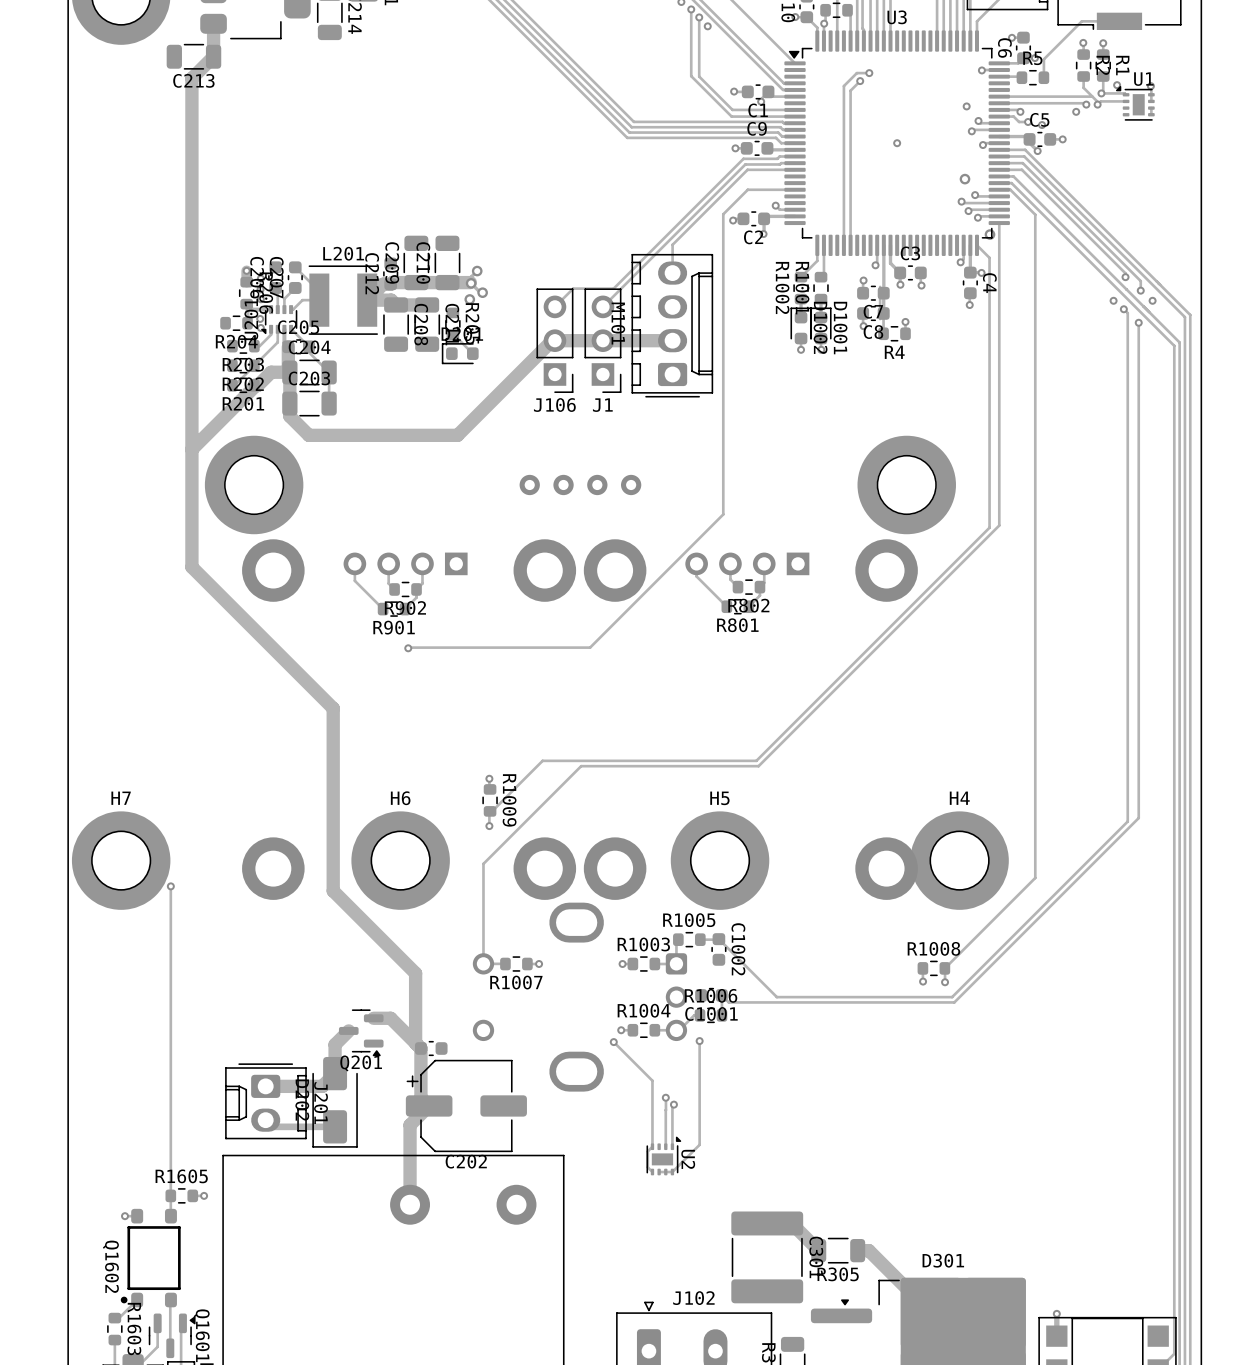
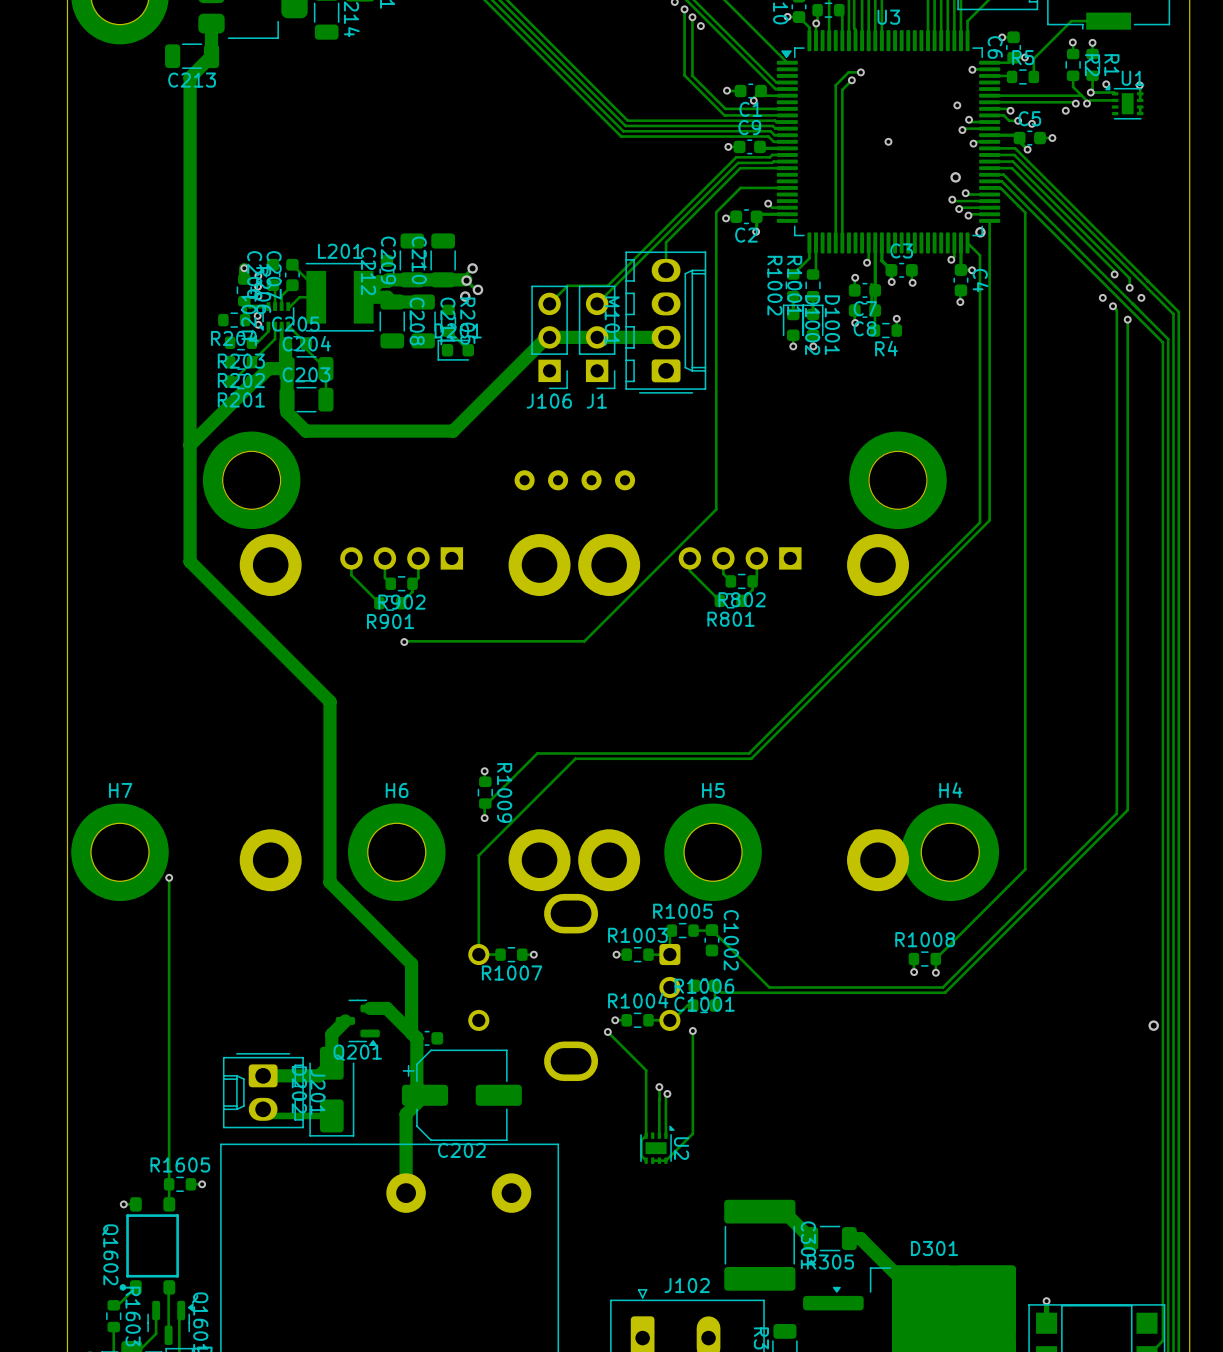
via: none -> (1153, 1025)

